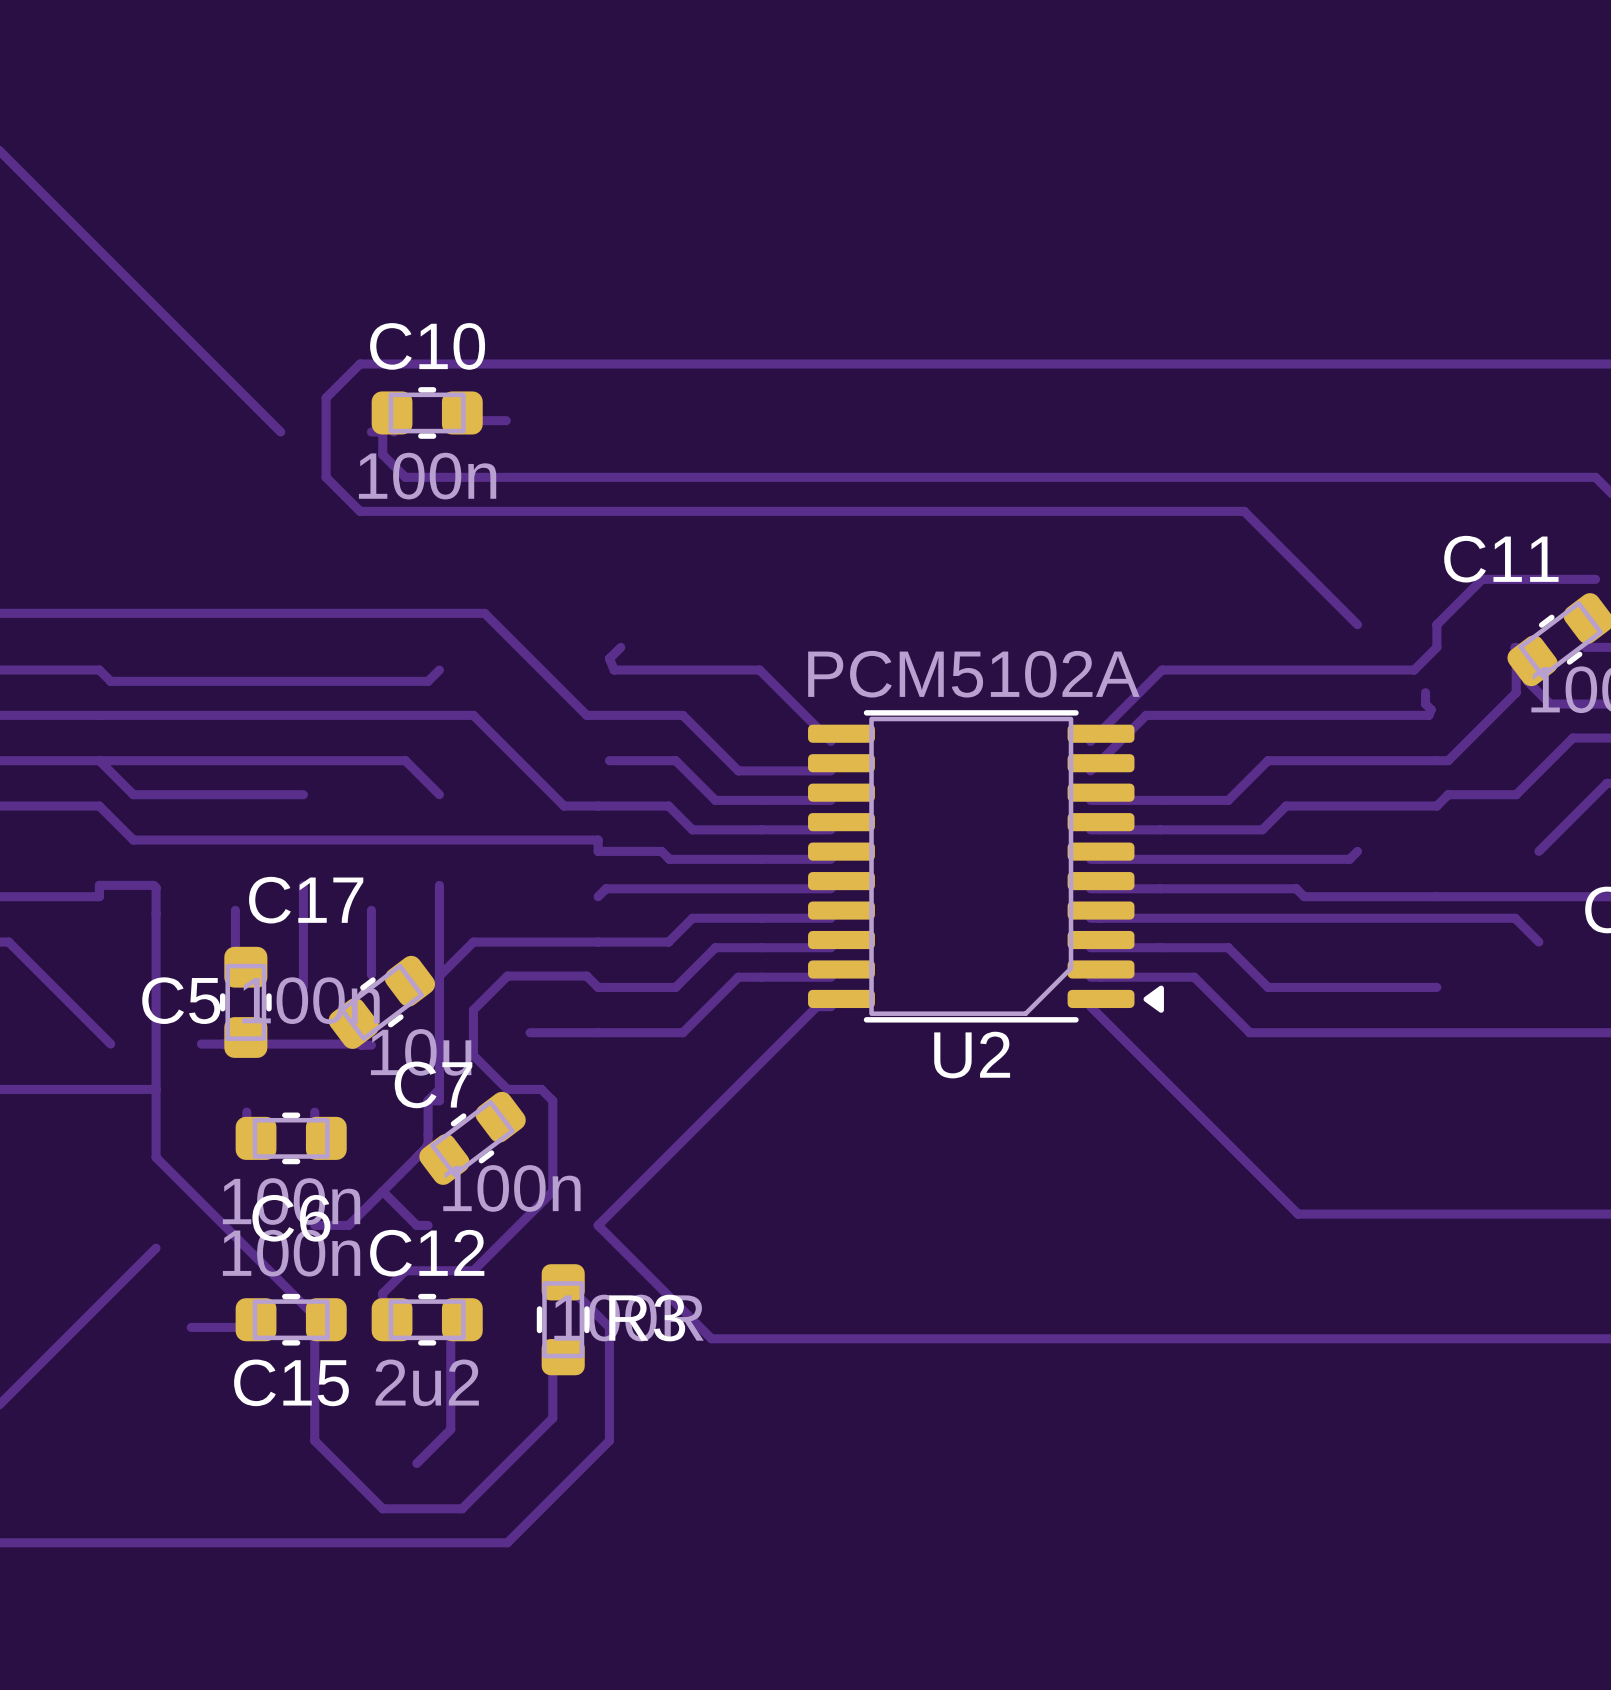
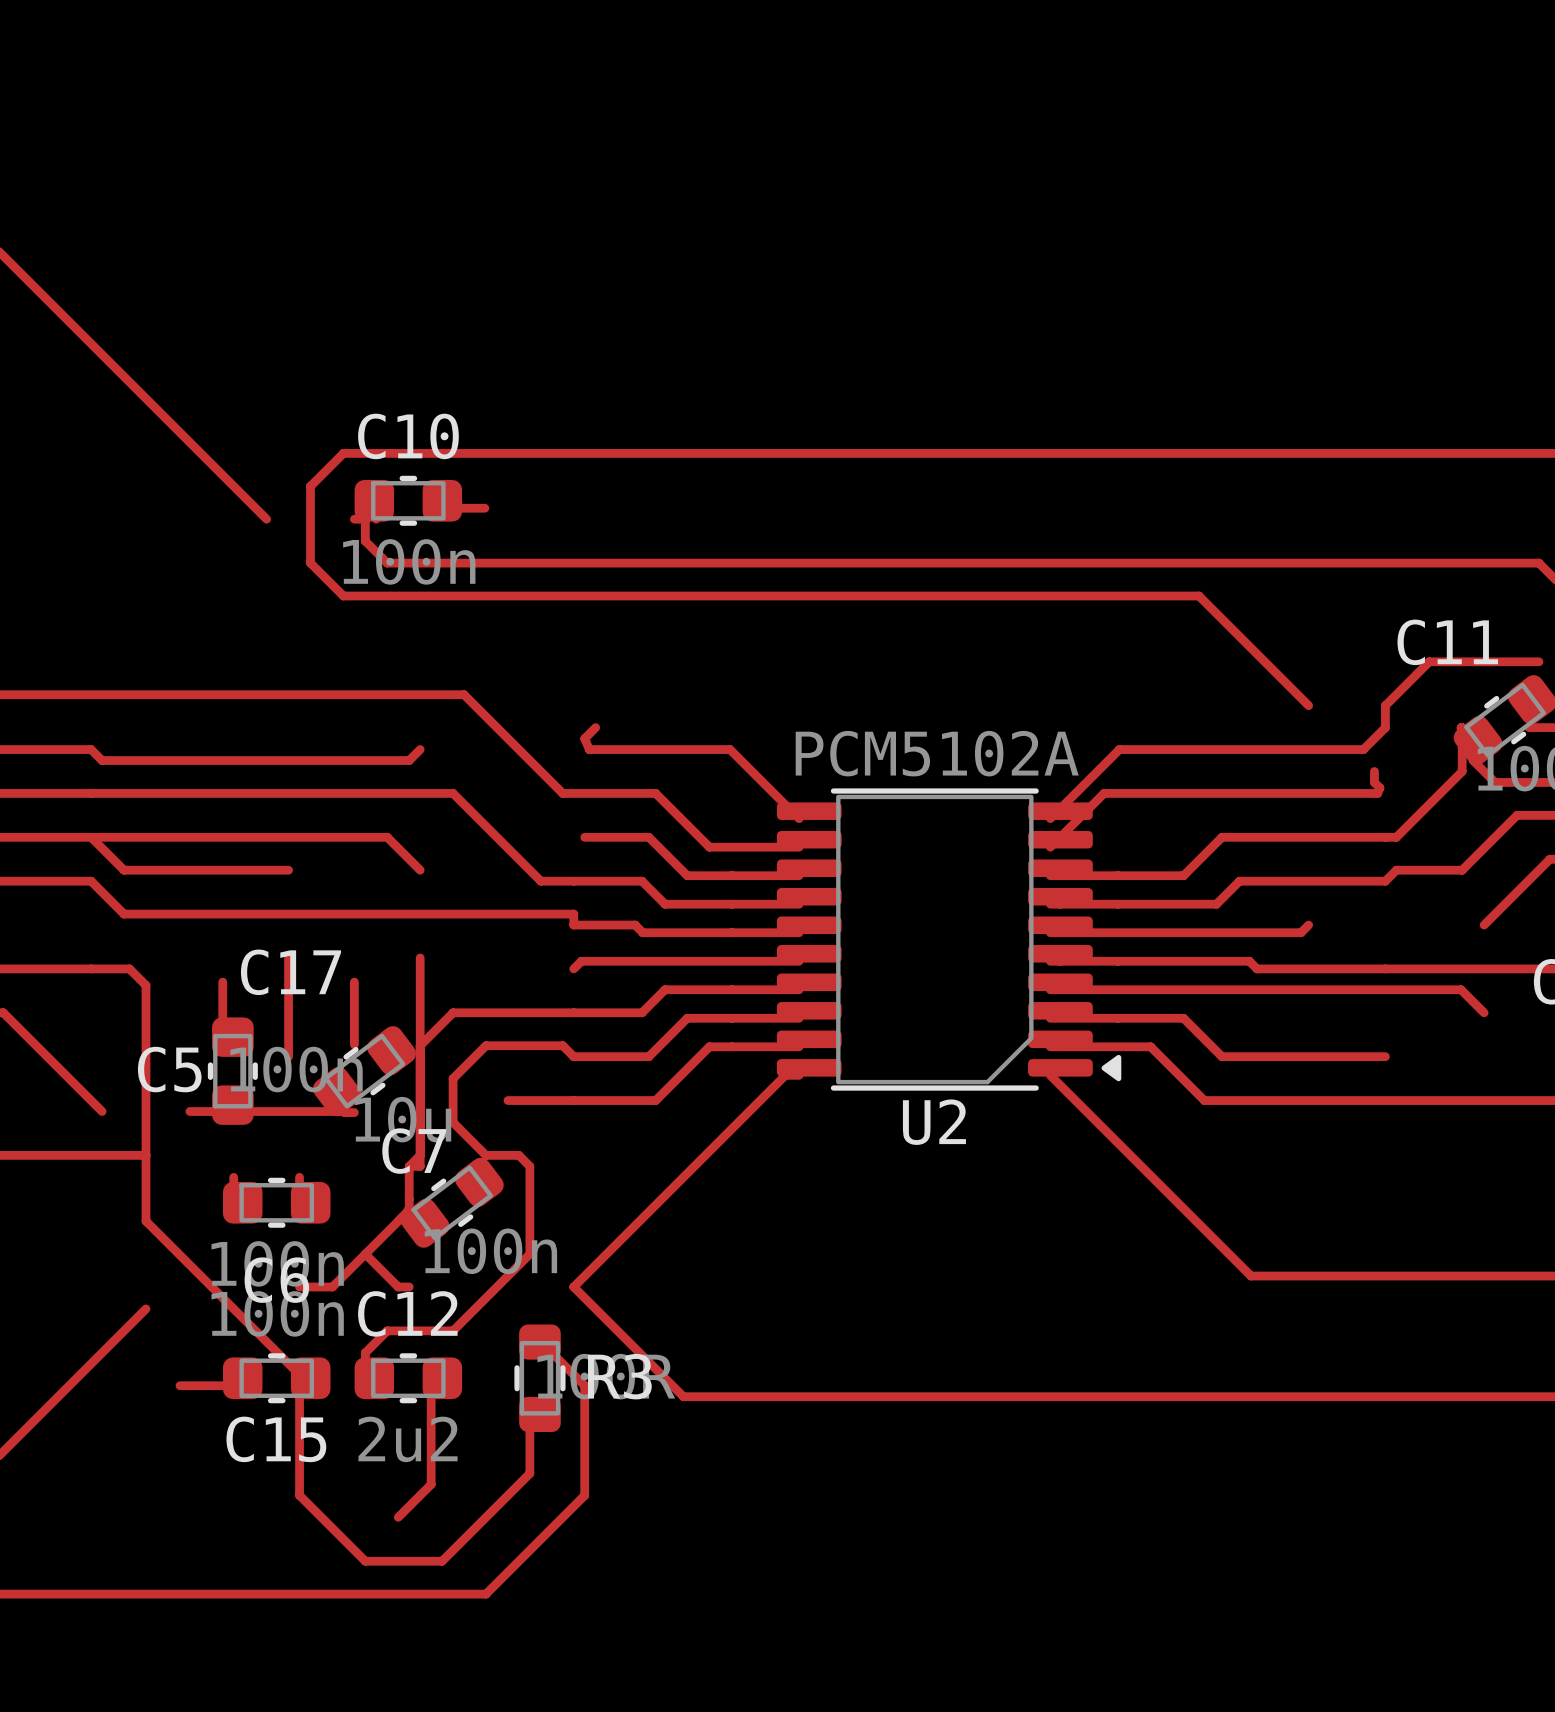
track: (99, 896) (99, 885) (153, 885) (156, 887) (156, 913) -> (91, 968) (129, 968) (145, 985)

